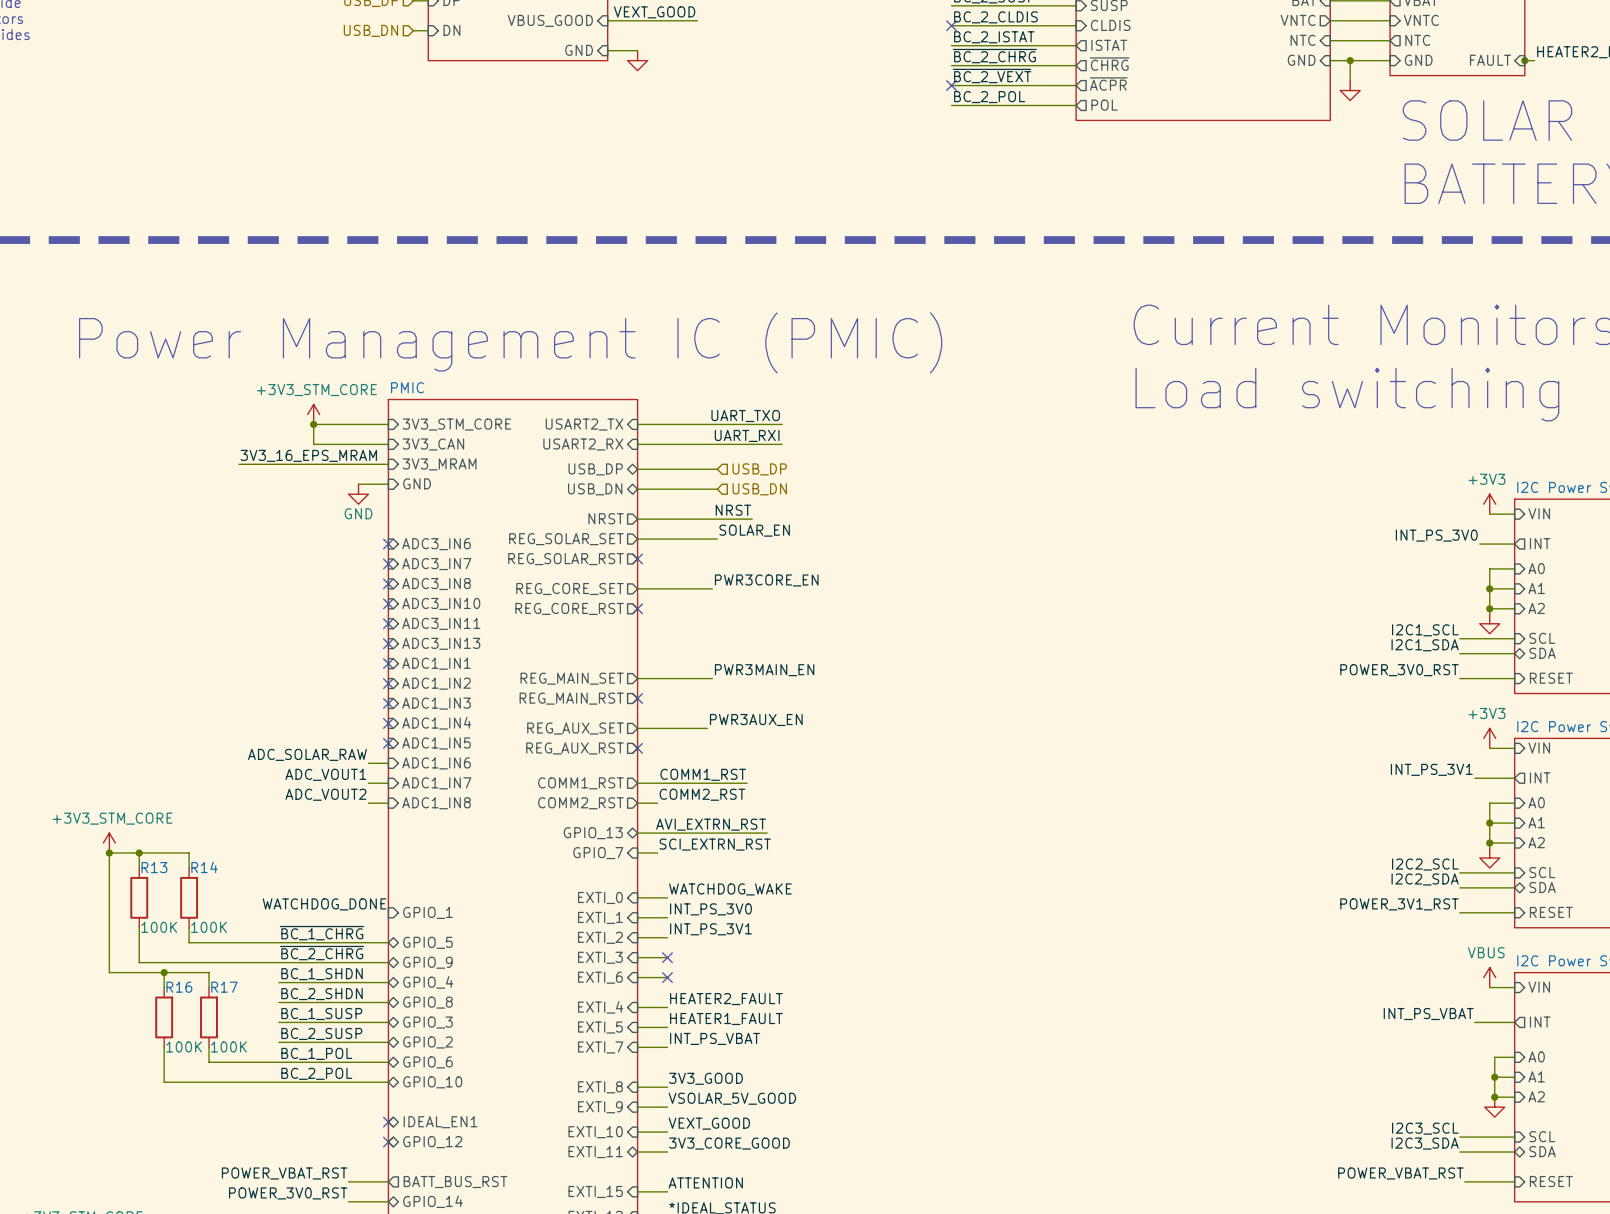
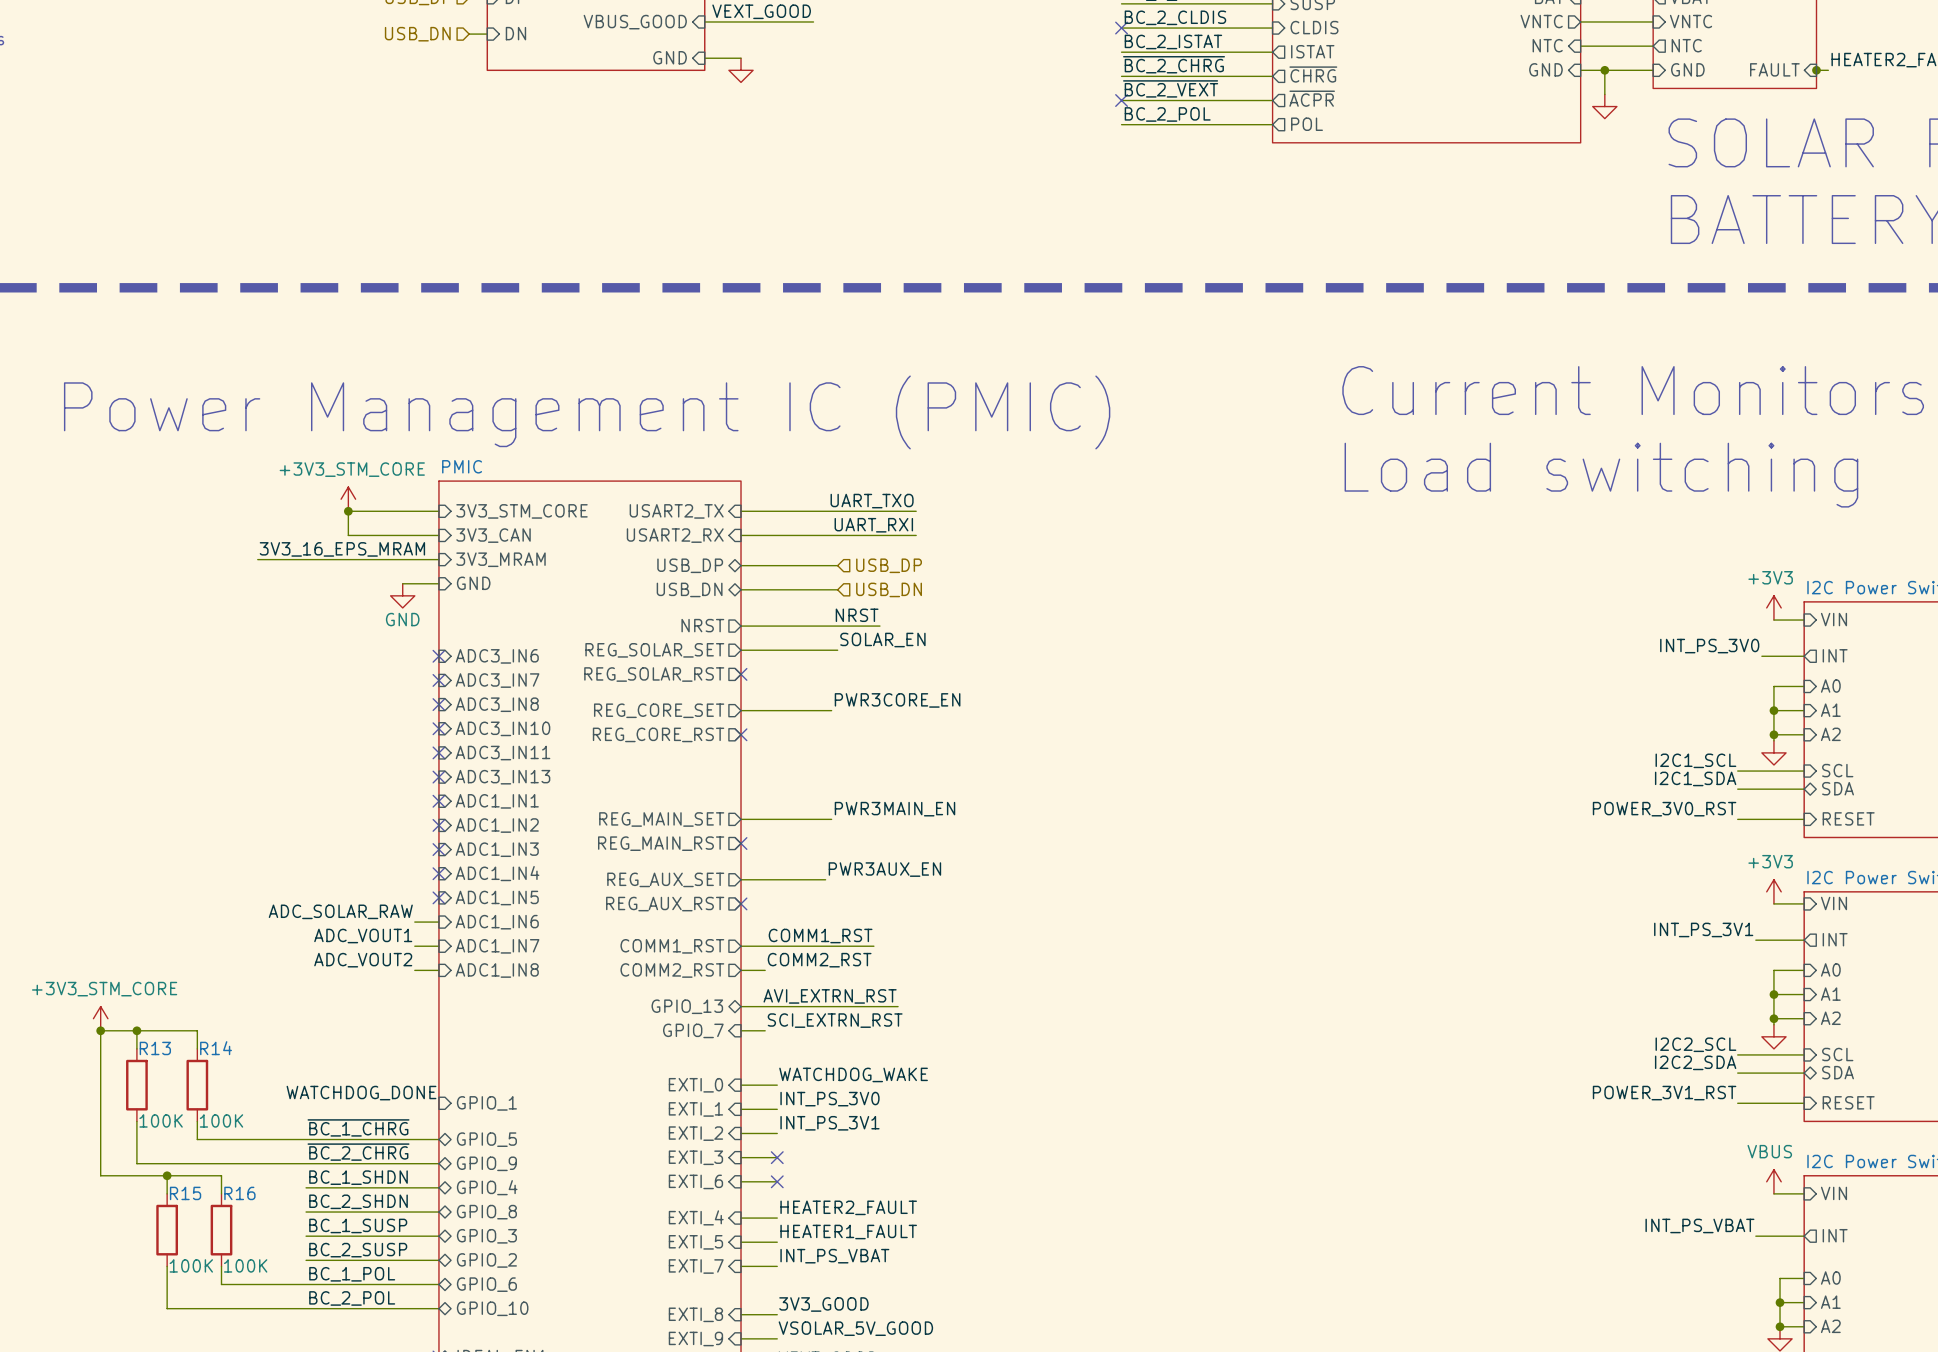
R16 name: R16 (179, 987) -> R15 (185, 1193)
R17 name: R17 (224, 987) -> R16 (239, 1193)

